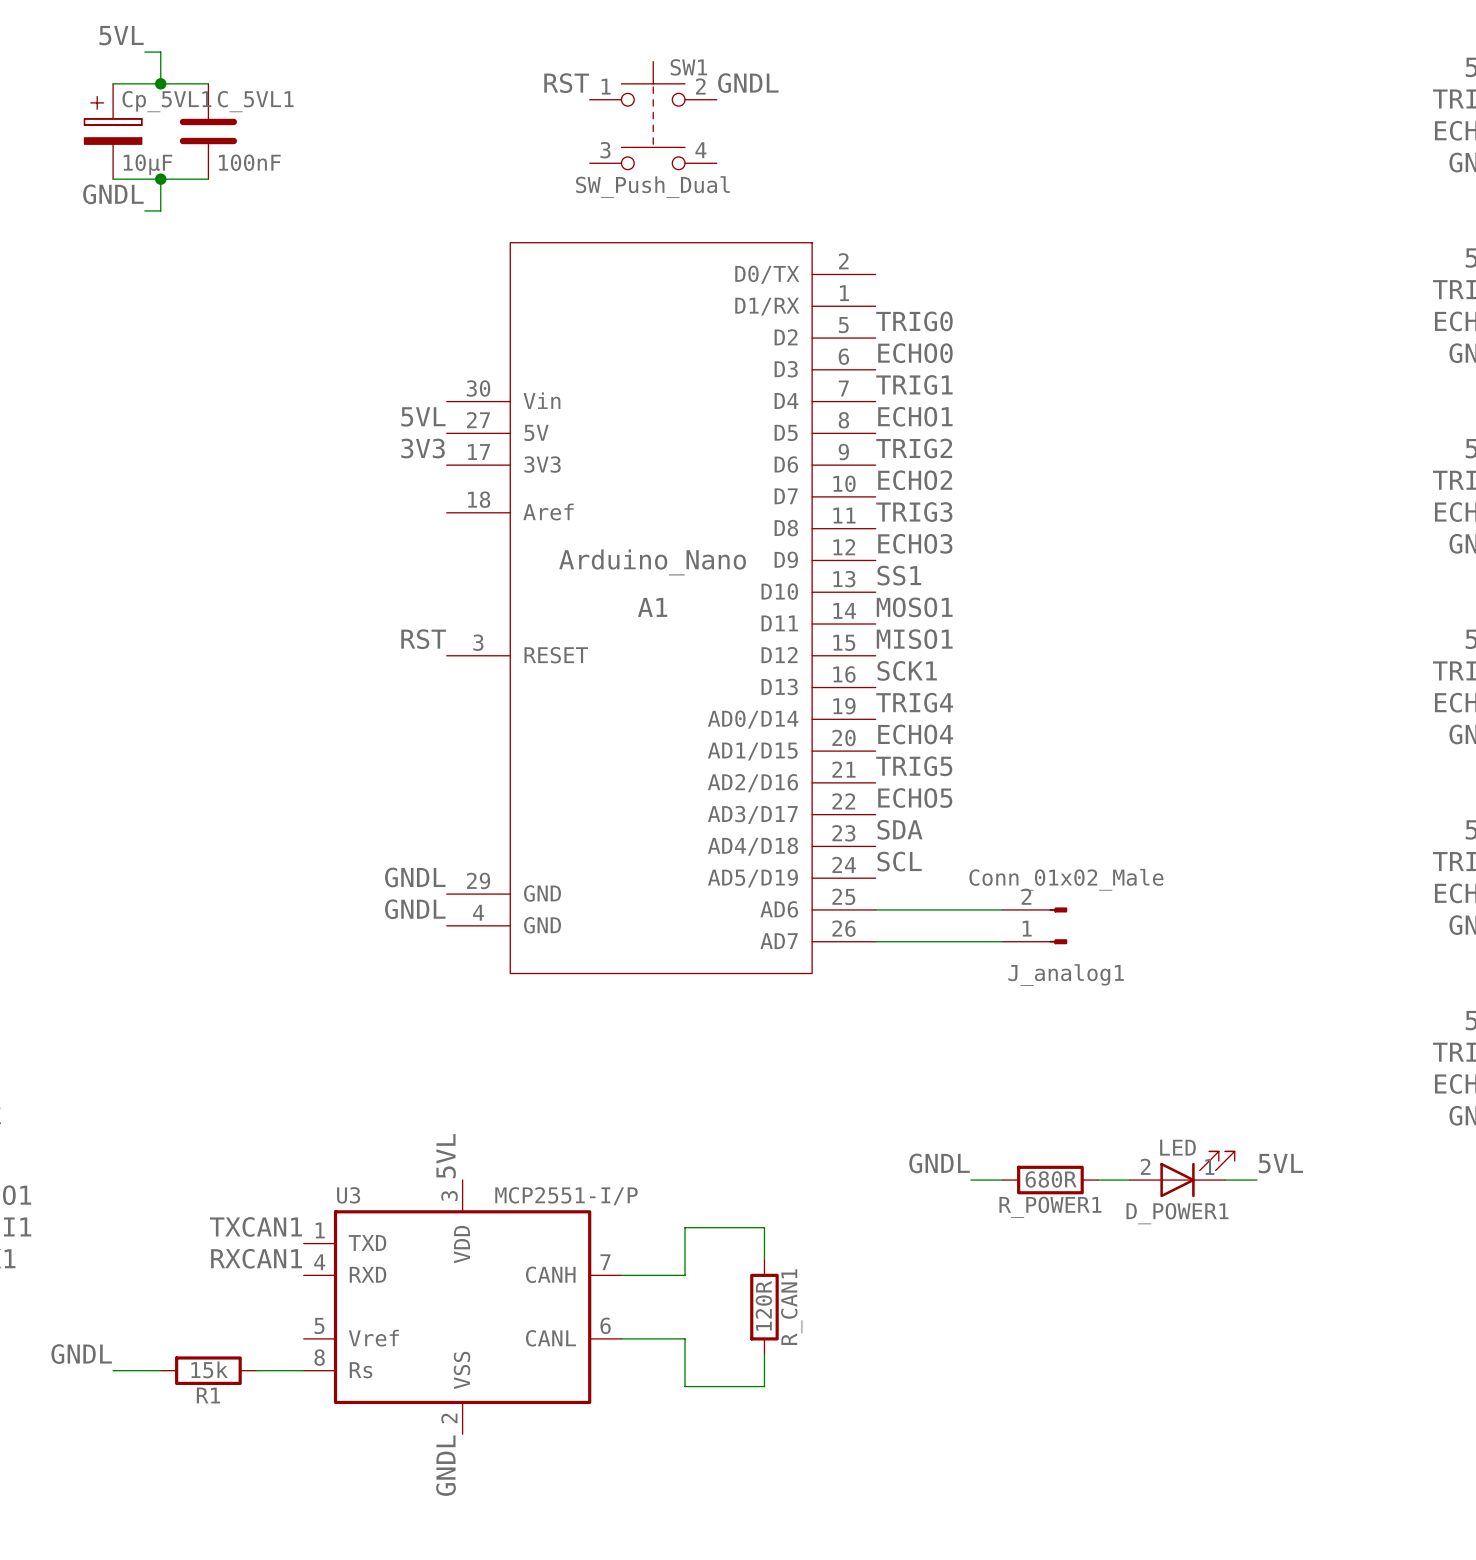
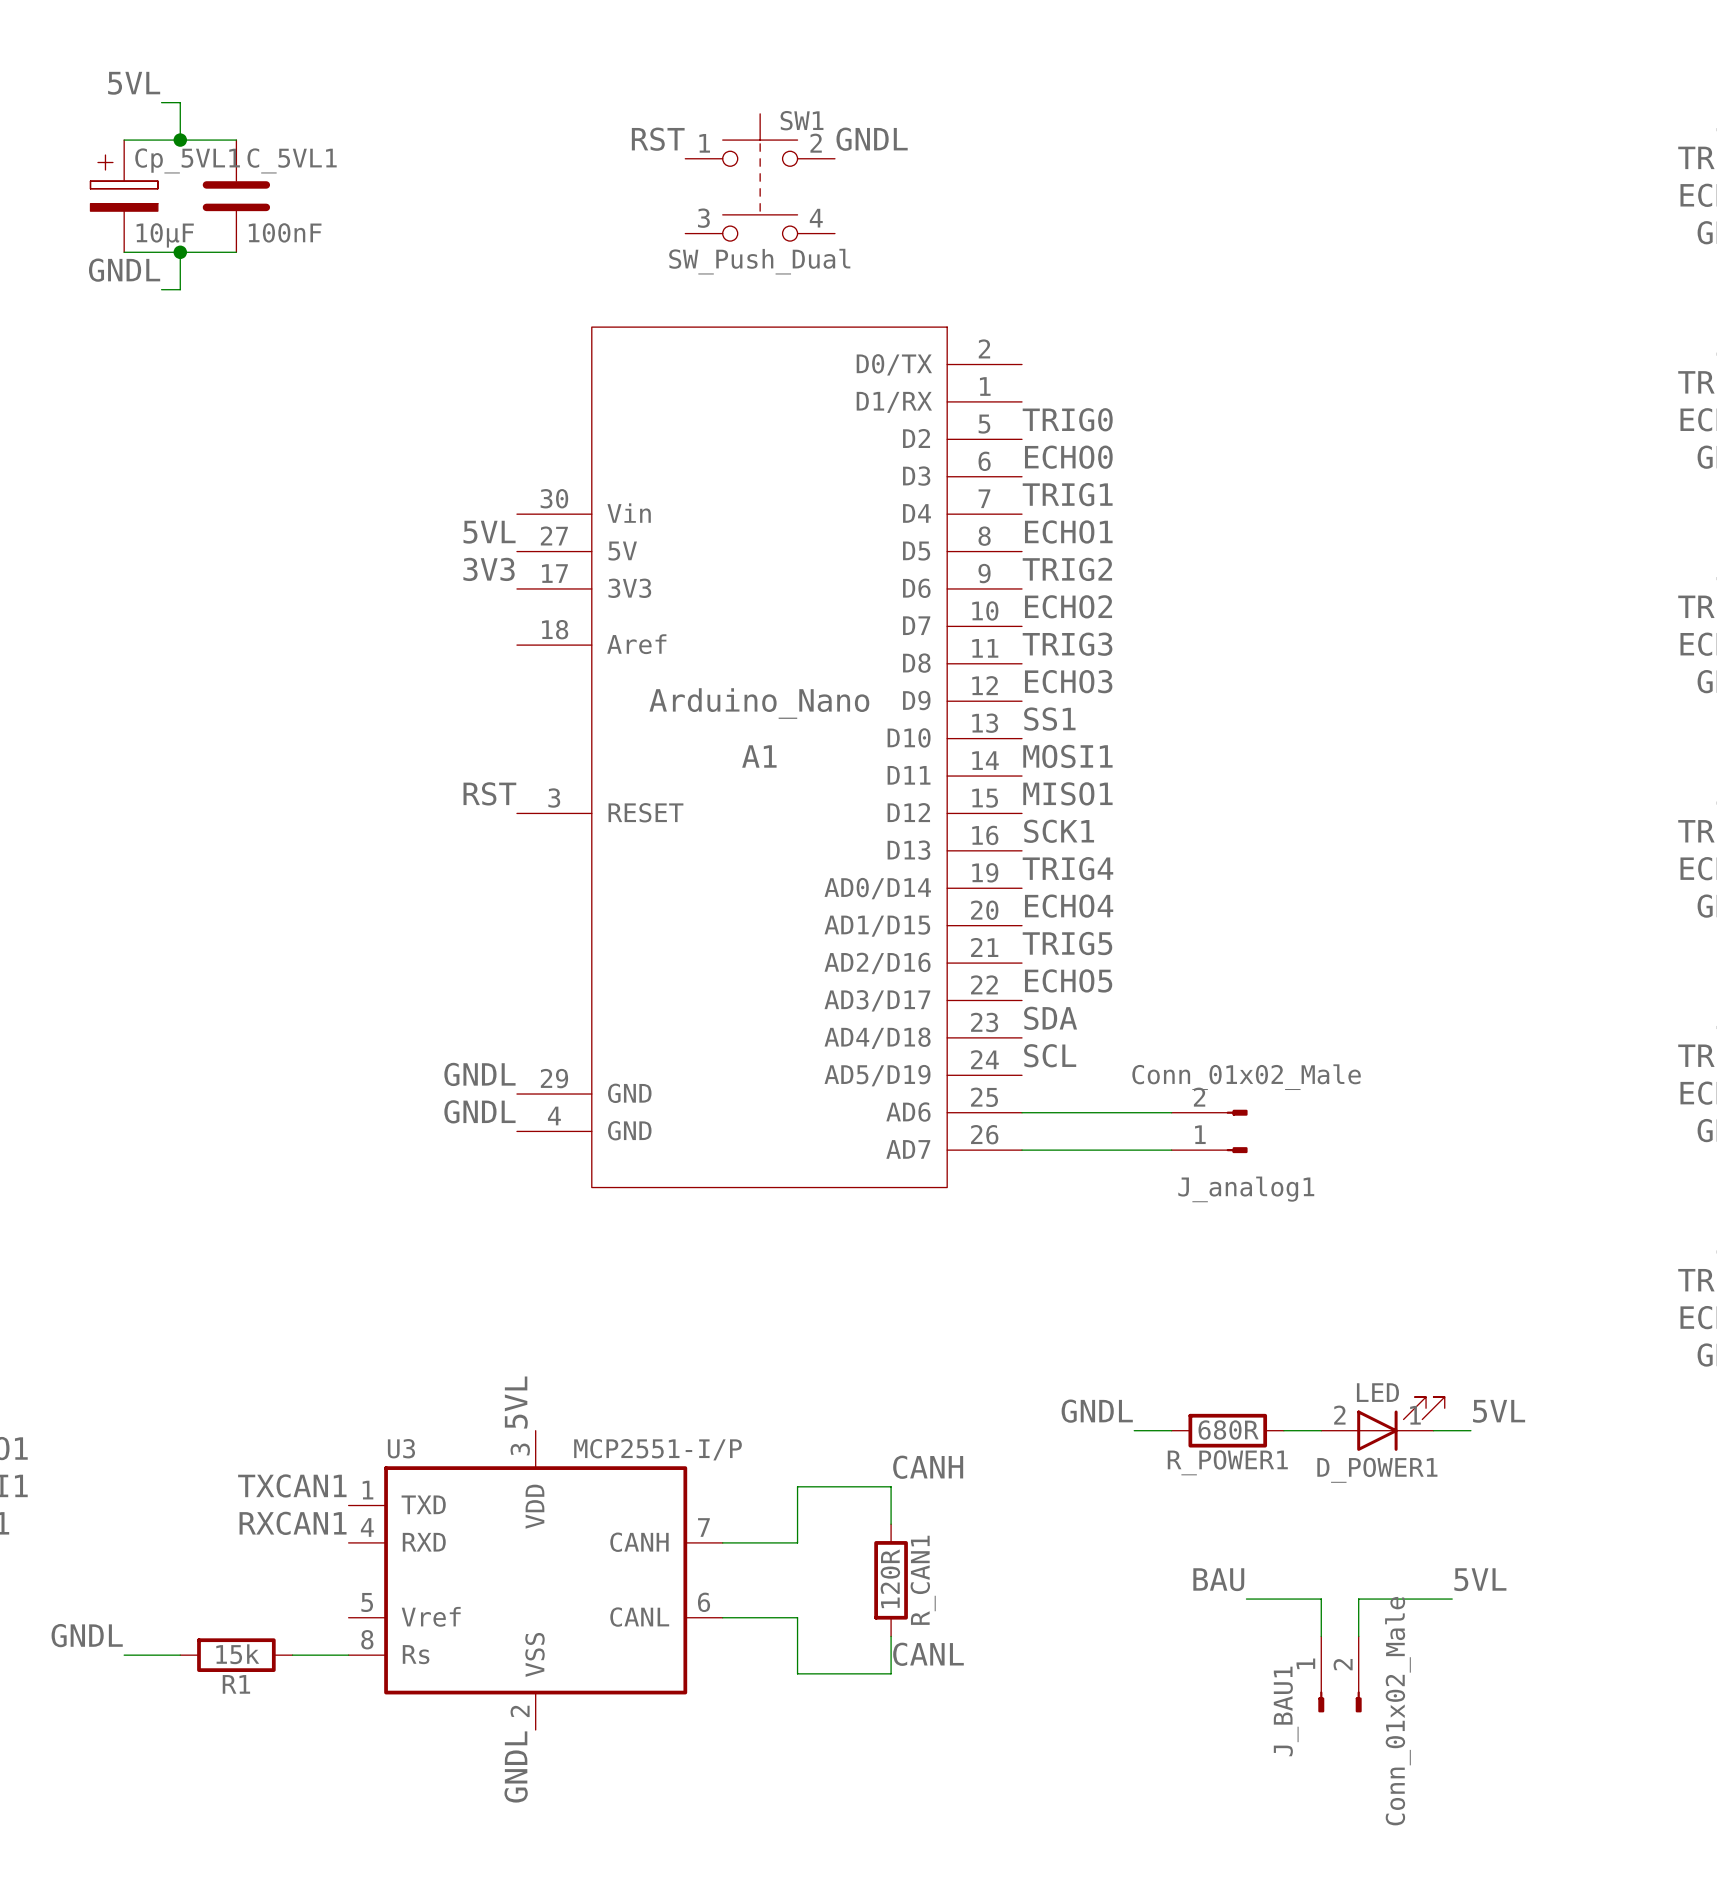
label: MOSO1 (914, 607) -> MOSI1 (1067, 756)
label: none -> CANH (928, 1467)
label: none -> BAU (1218, 1579)
label: none -> 5VL (1480, 1579)
wire: none -> (1246, 1599) (1321, 1599) (1321, 1636)
wire: none -> (1452, 1599) (1358, 1599) (1358, 1636)
label: none -> CANL (928, 1654)
J_BAU1: none -> Conn_01x02_Male (1339, 1674)

